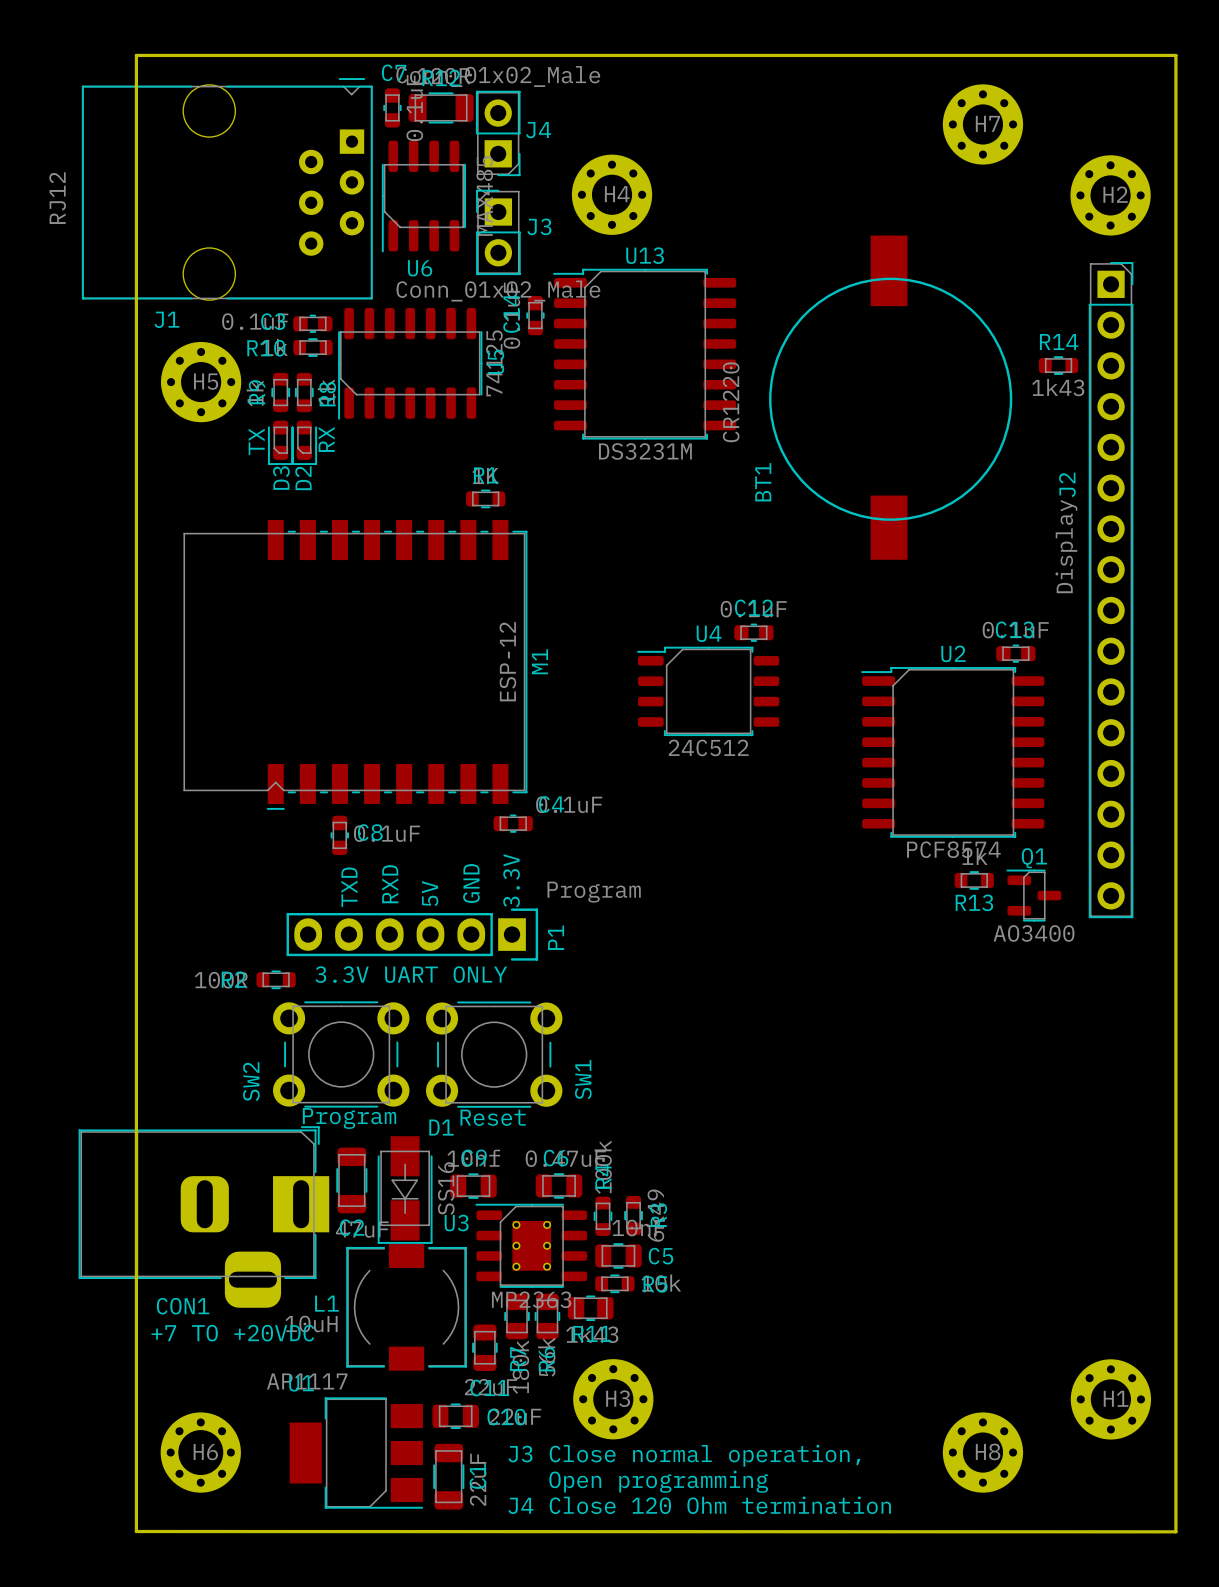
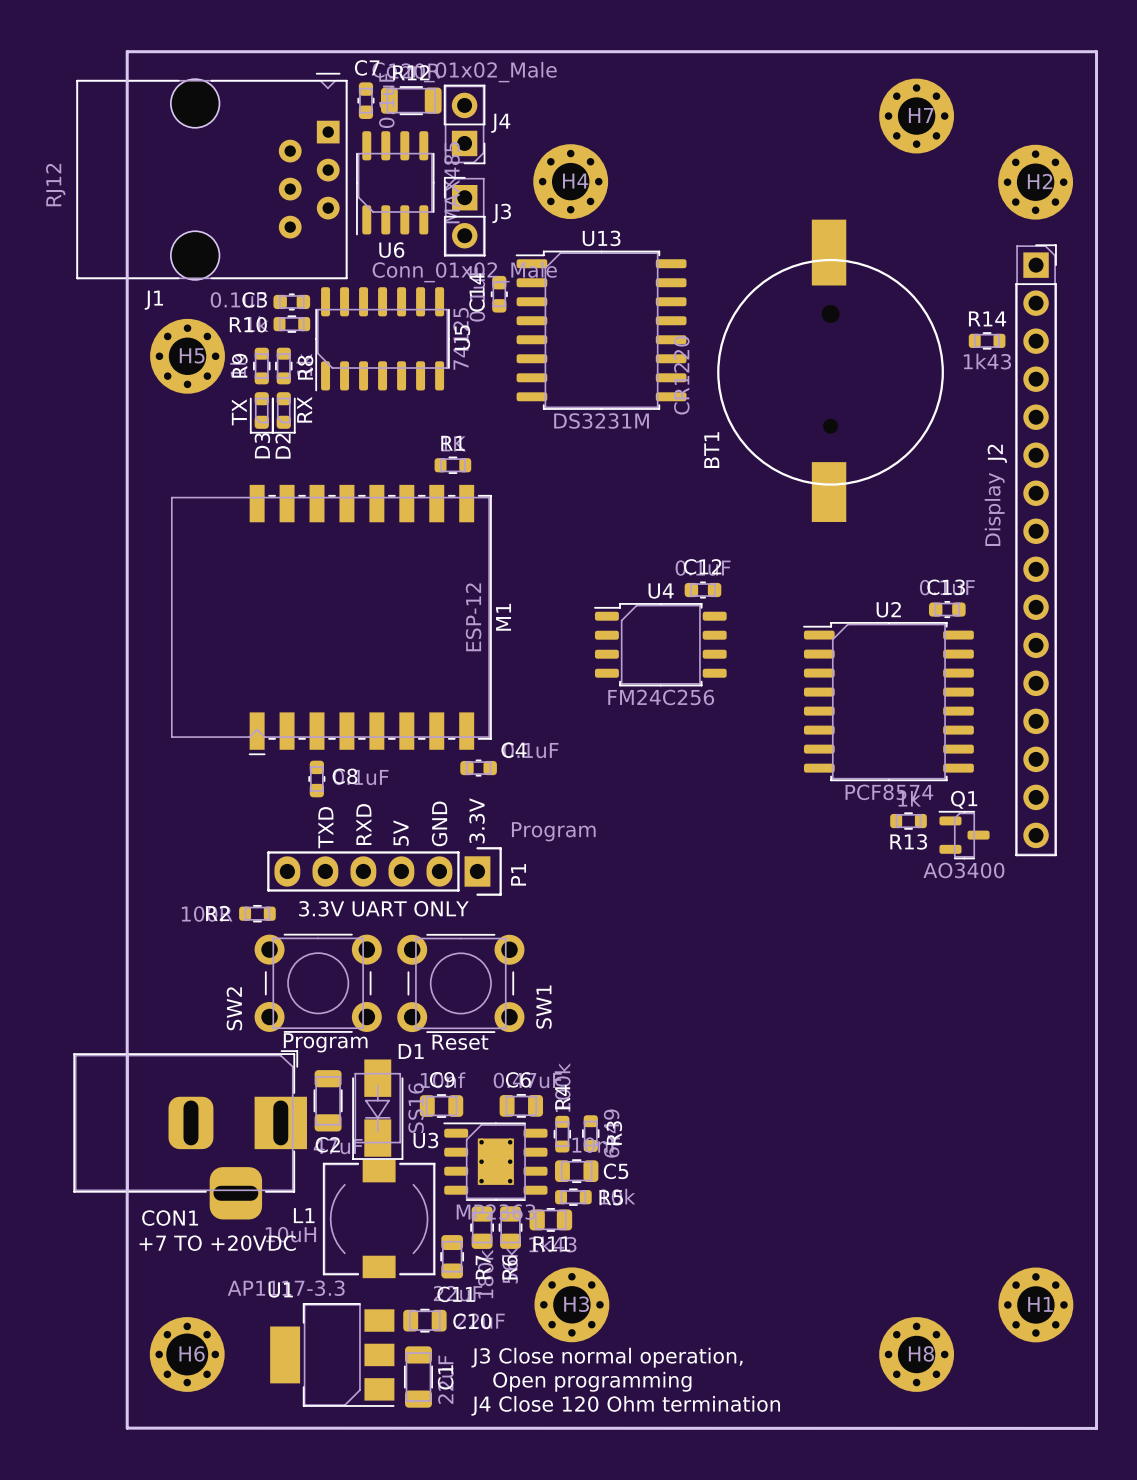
U4 value: 24C512 (708, 747) -> FM24C256 (661, 697)
U1 value: AP1117 (307, 1381) -> AP1117-3.3 (286, 1288)

